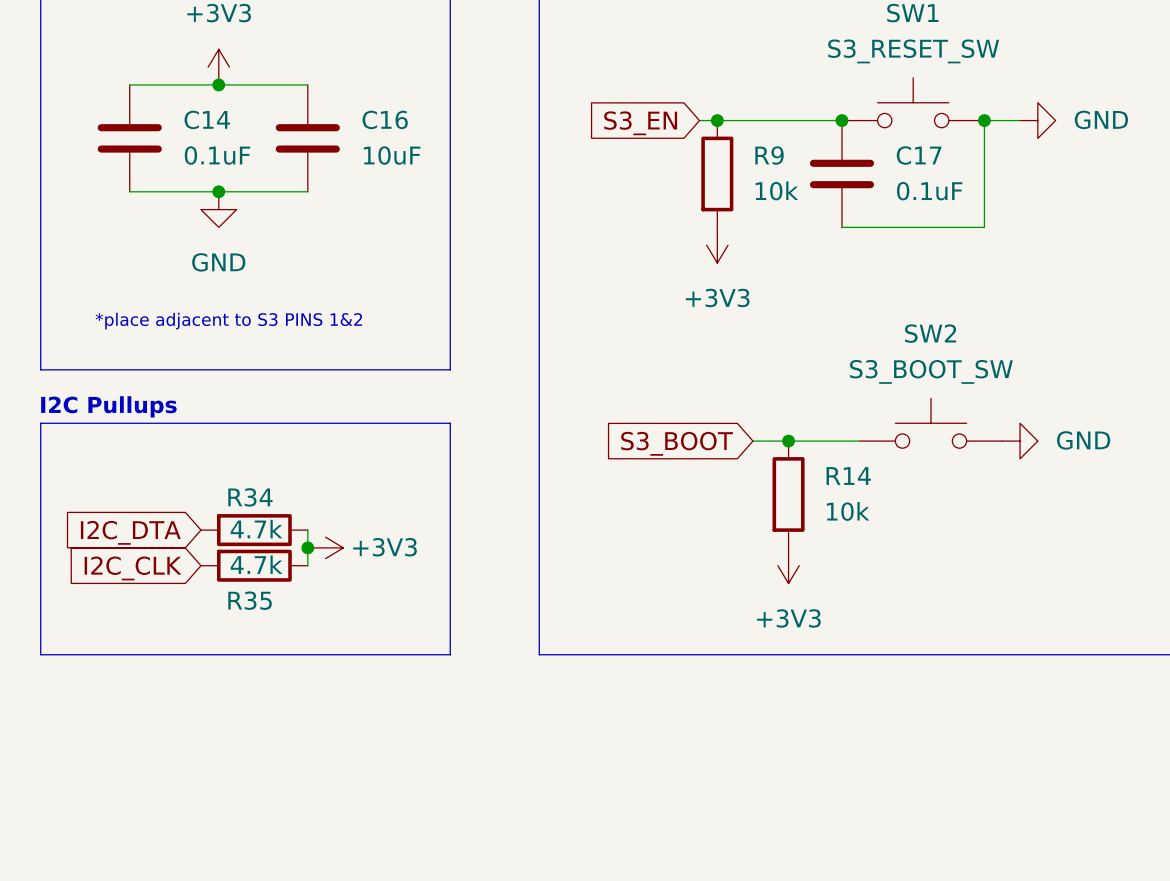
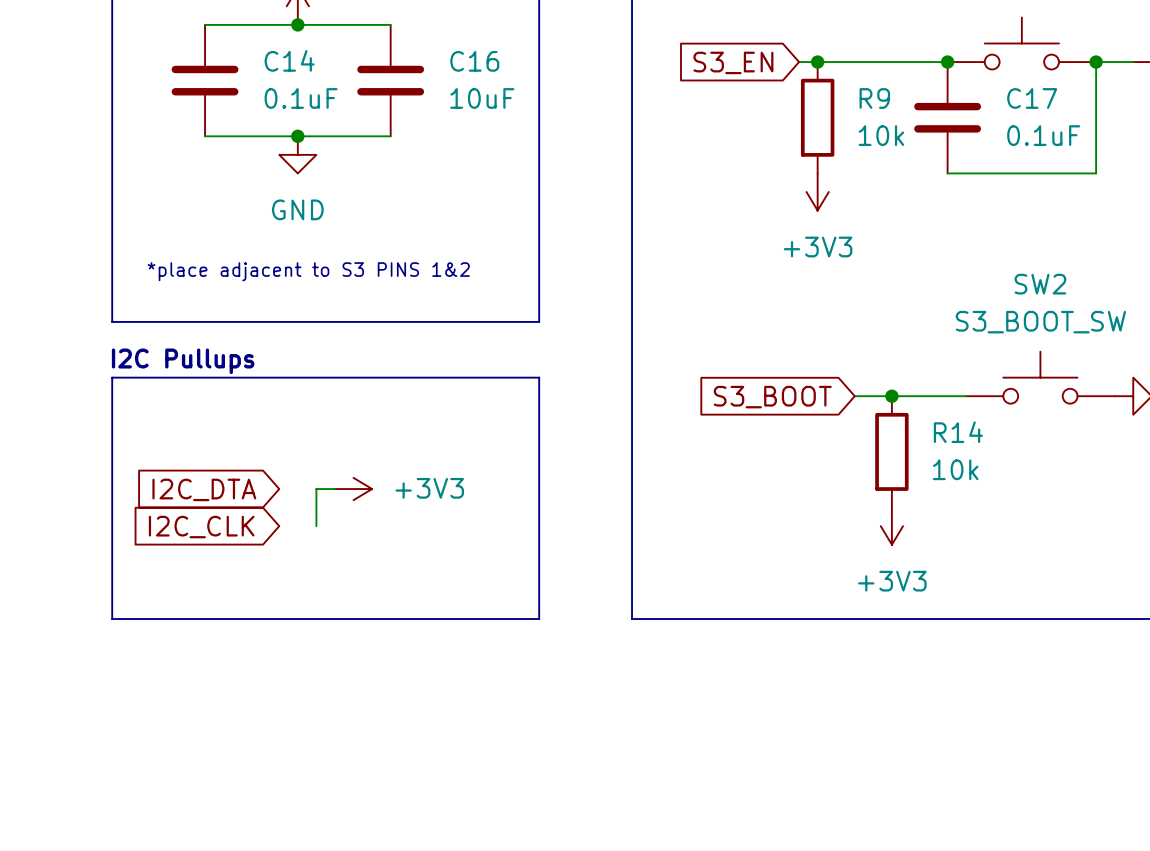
wire: none -> (334, 489) (316, 489) (316, 526)
R34: 4.7k (254, 530) -> none
wire: (307, 530) (307, 565) -> none
junction: (307, 547) -> none
power symbol position: +3V3 (325, 547) -> +3V3 (353, 489)
power symbol text position: +3V3 (384, 547) -> +3V3 (429, 488)
R35: 4.7k (254, 565) -> none

